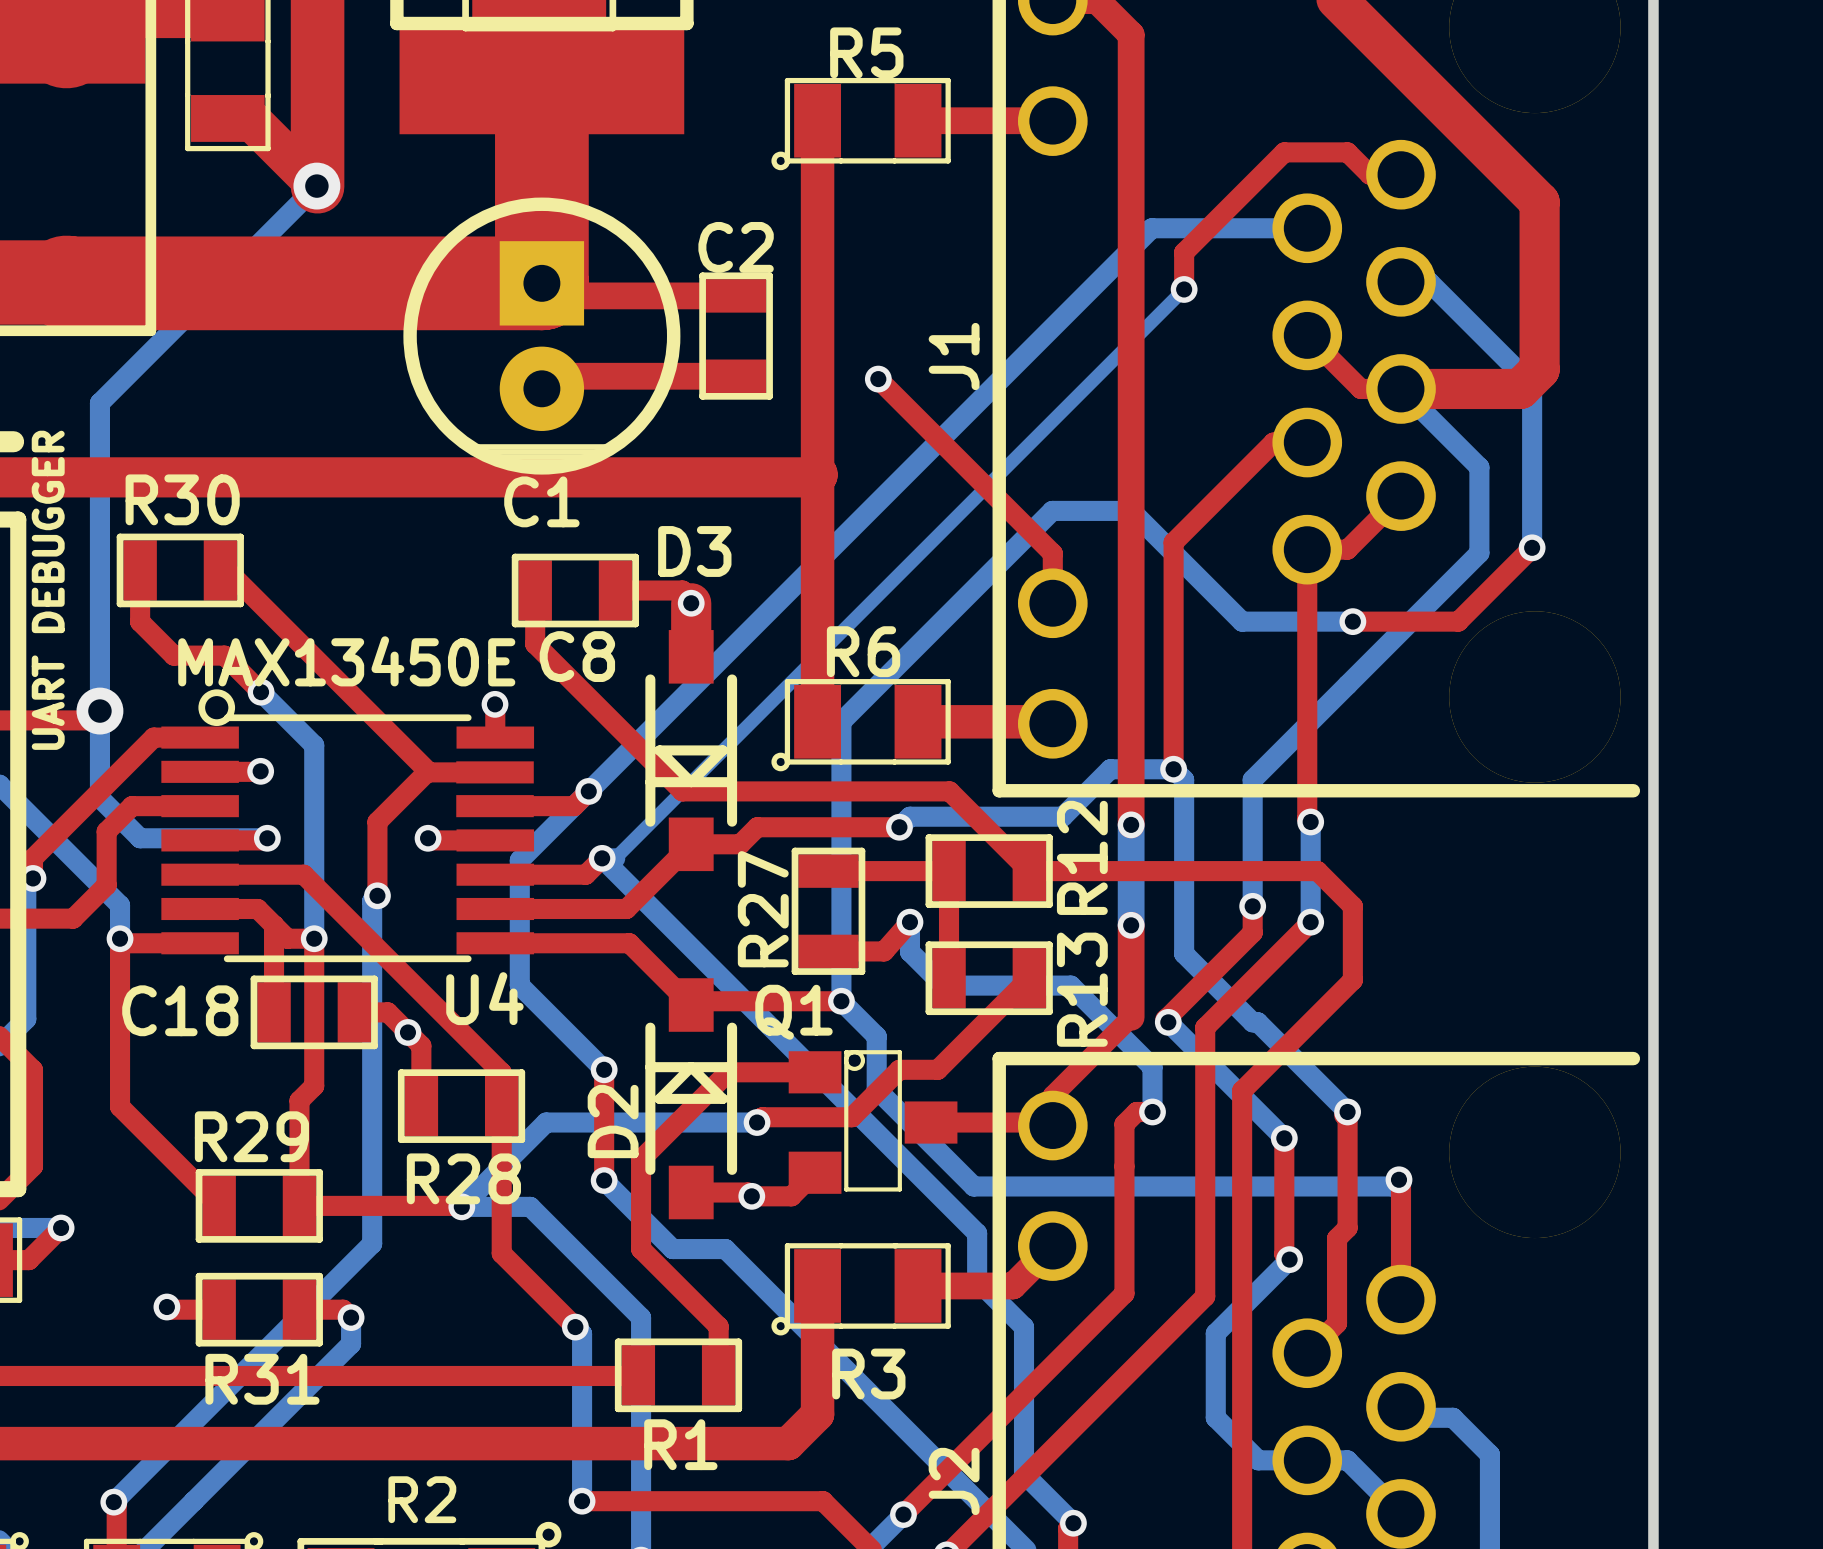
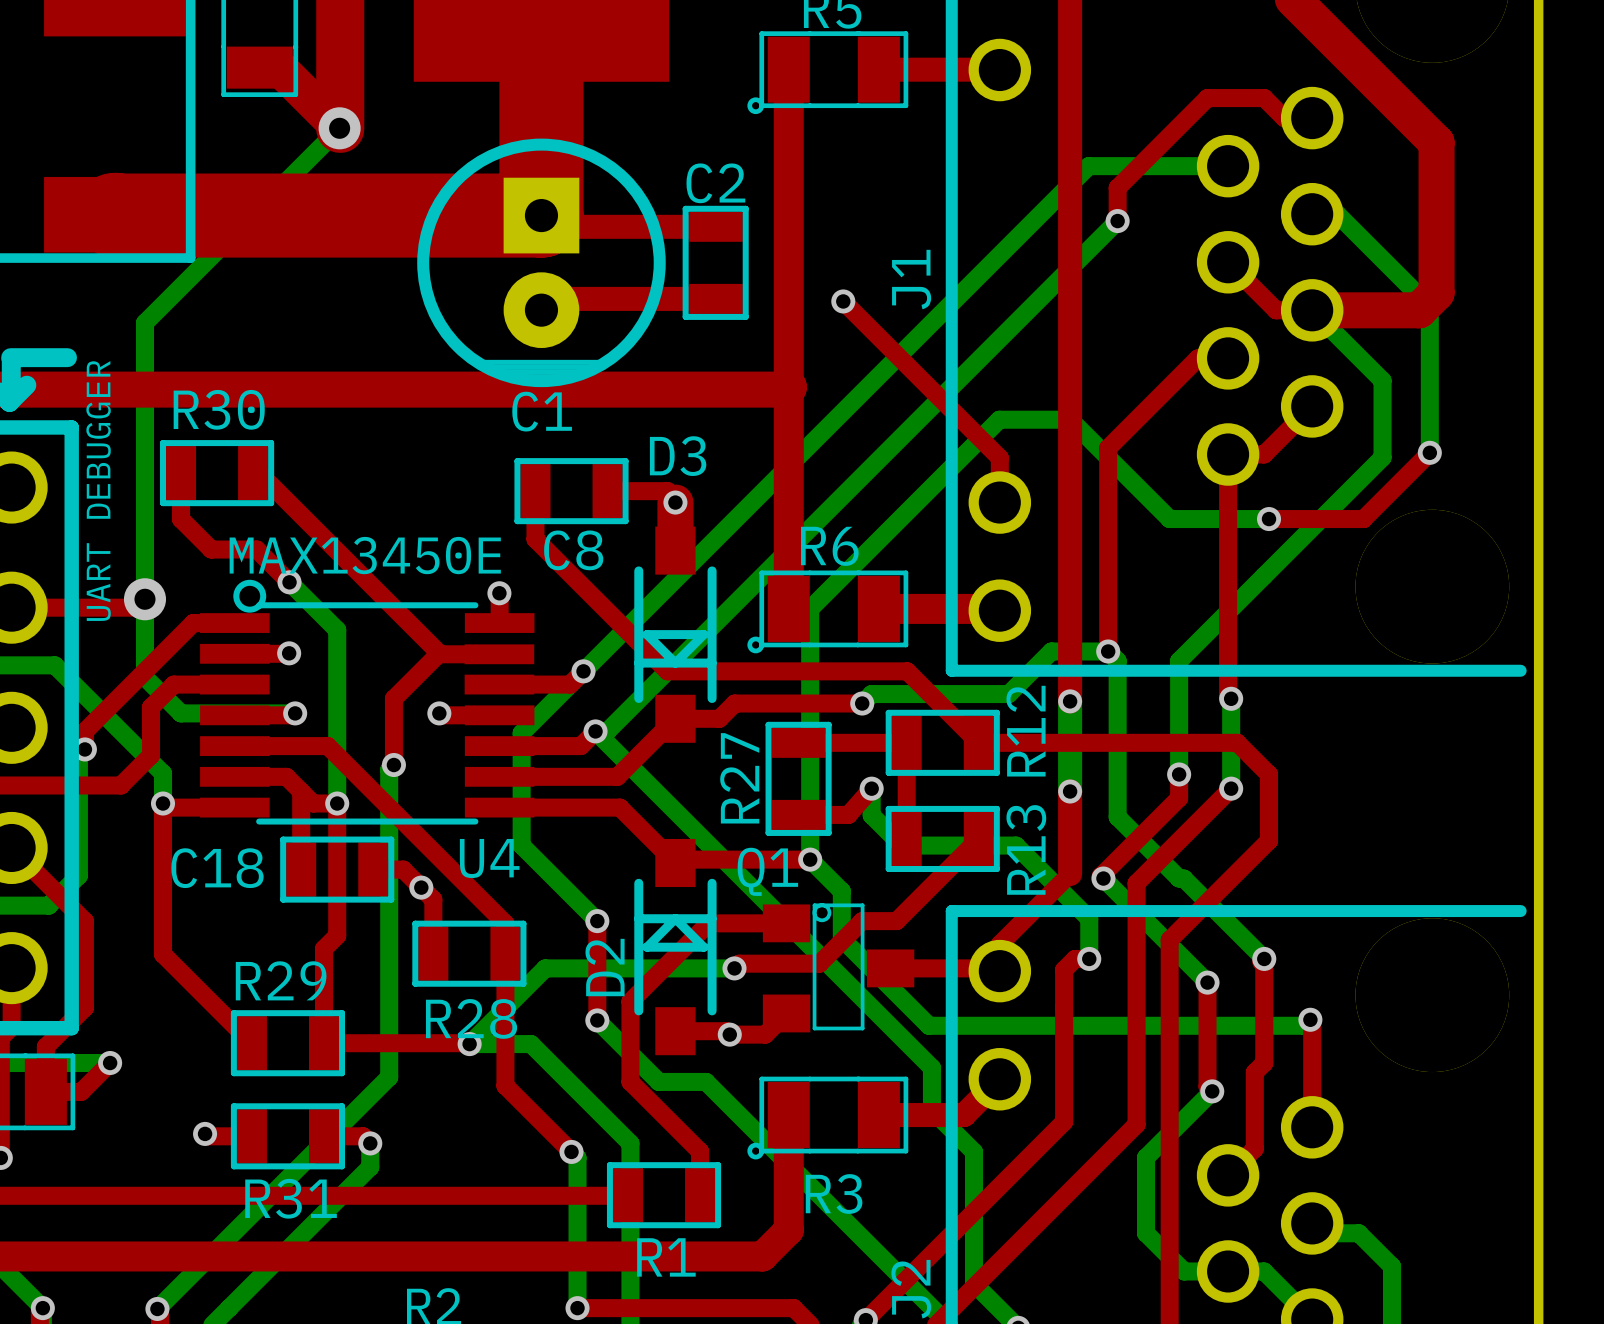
bottom track width: thin (1184, 289) (615, 858) -> thick (1117, 221) (607, 731)

